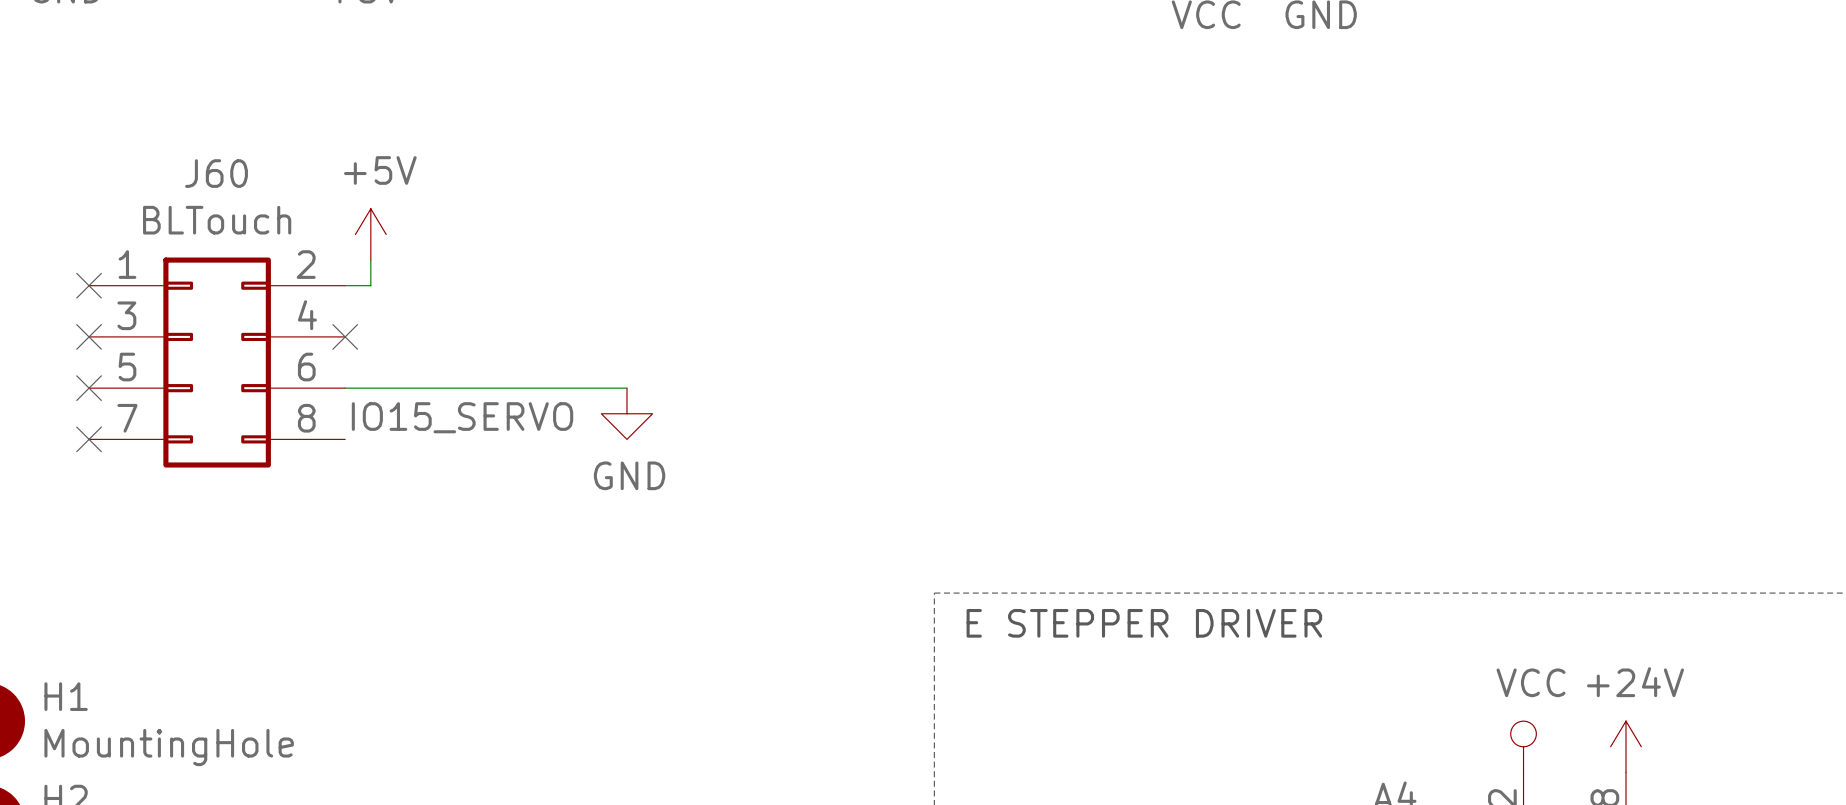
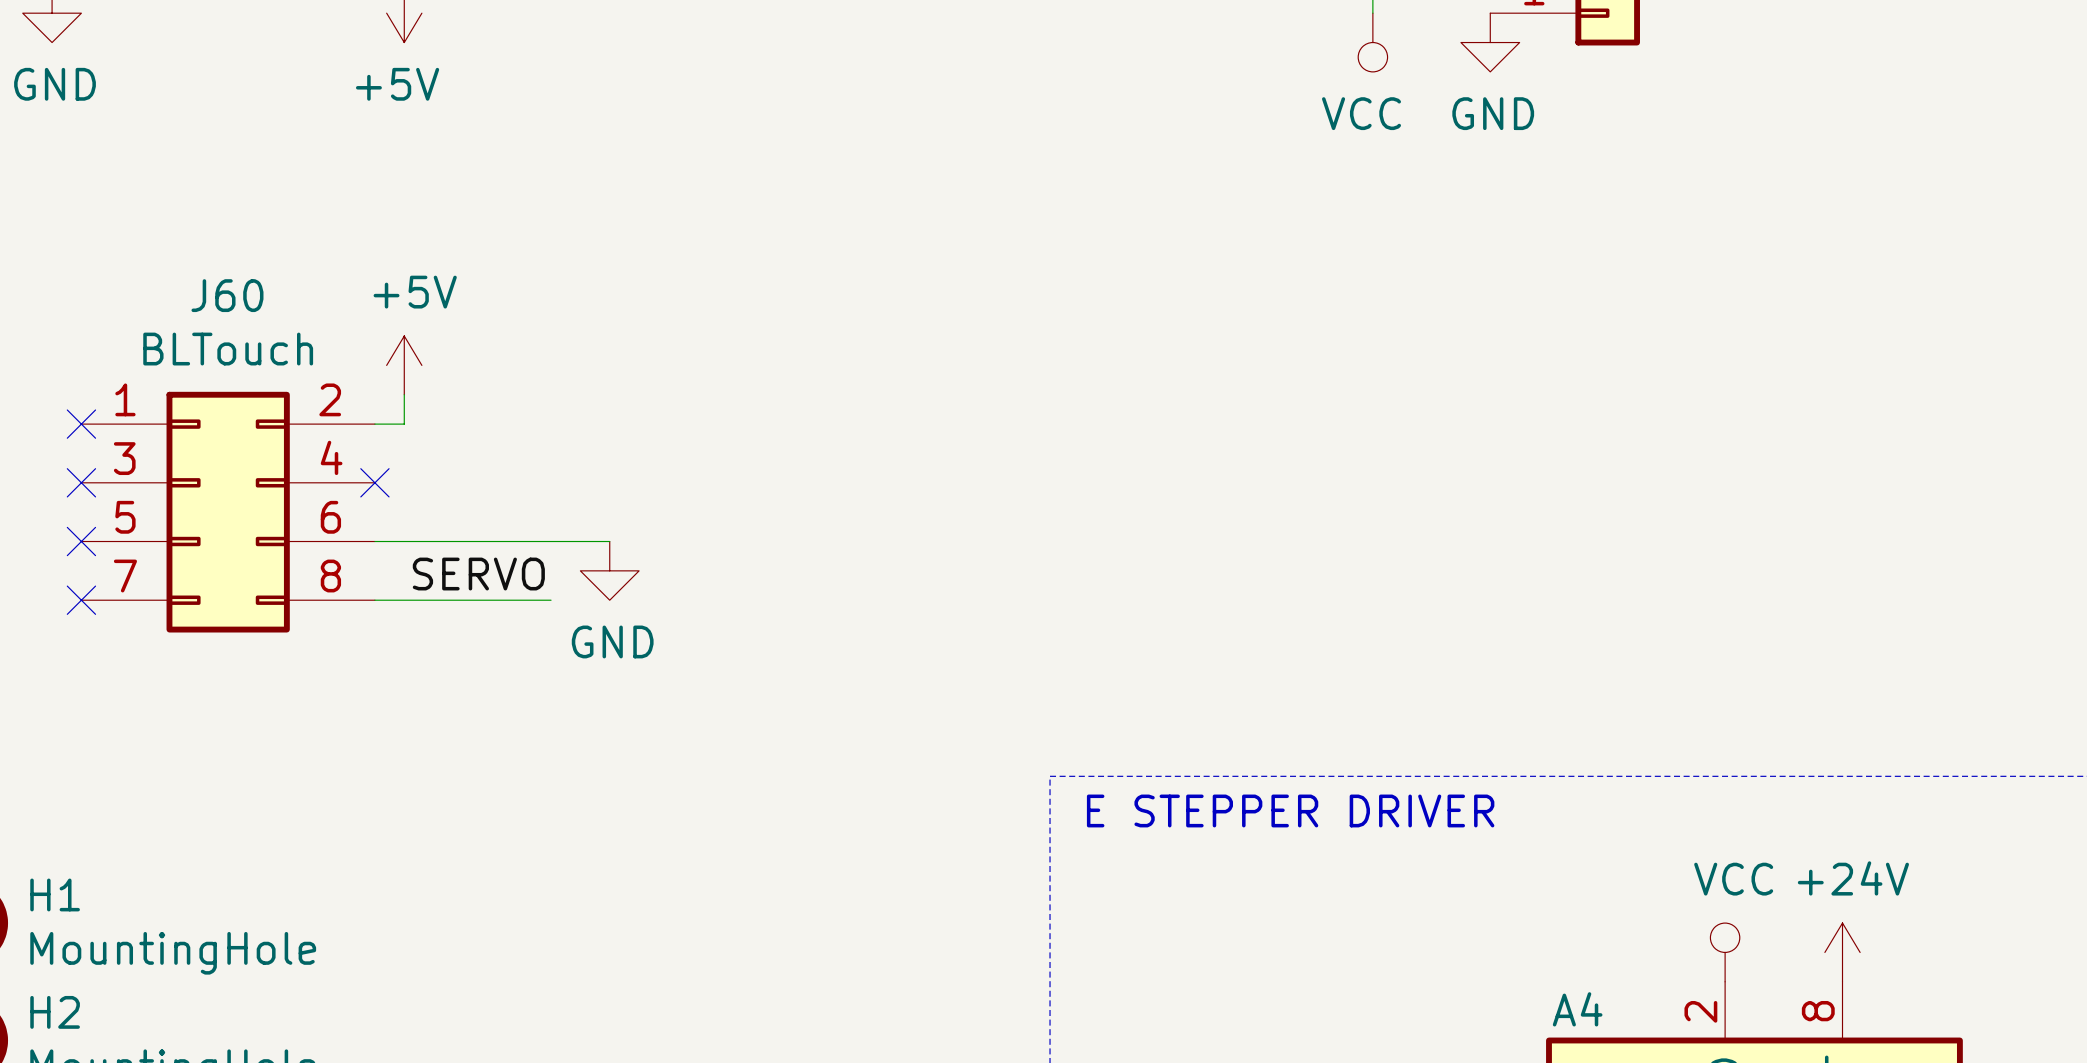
wire: (550, 388) (626, 388) -> none
power symbol position: GND (626, 413) -> GND (609, 570)
label: IO15_SERVO (462, 417) -> SERVO (478, 574)
wire: none -> (374, 600) (551, 600)

